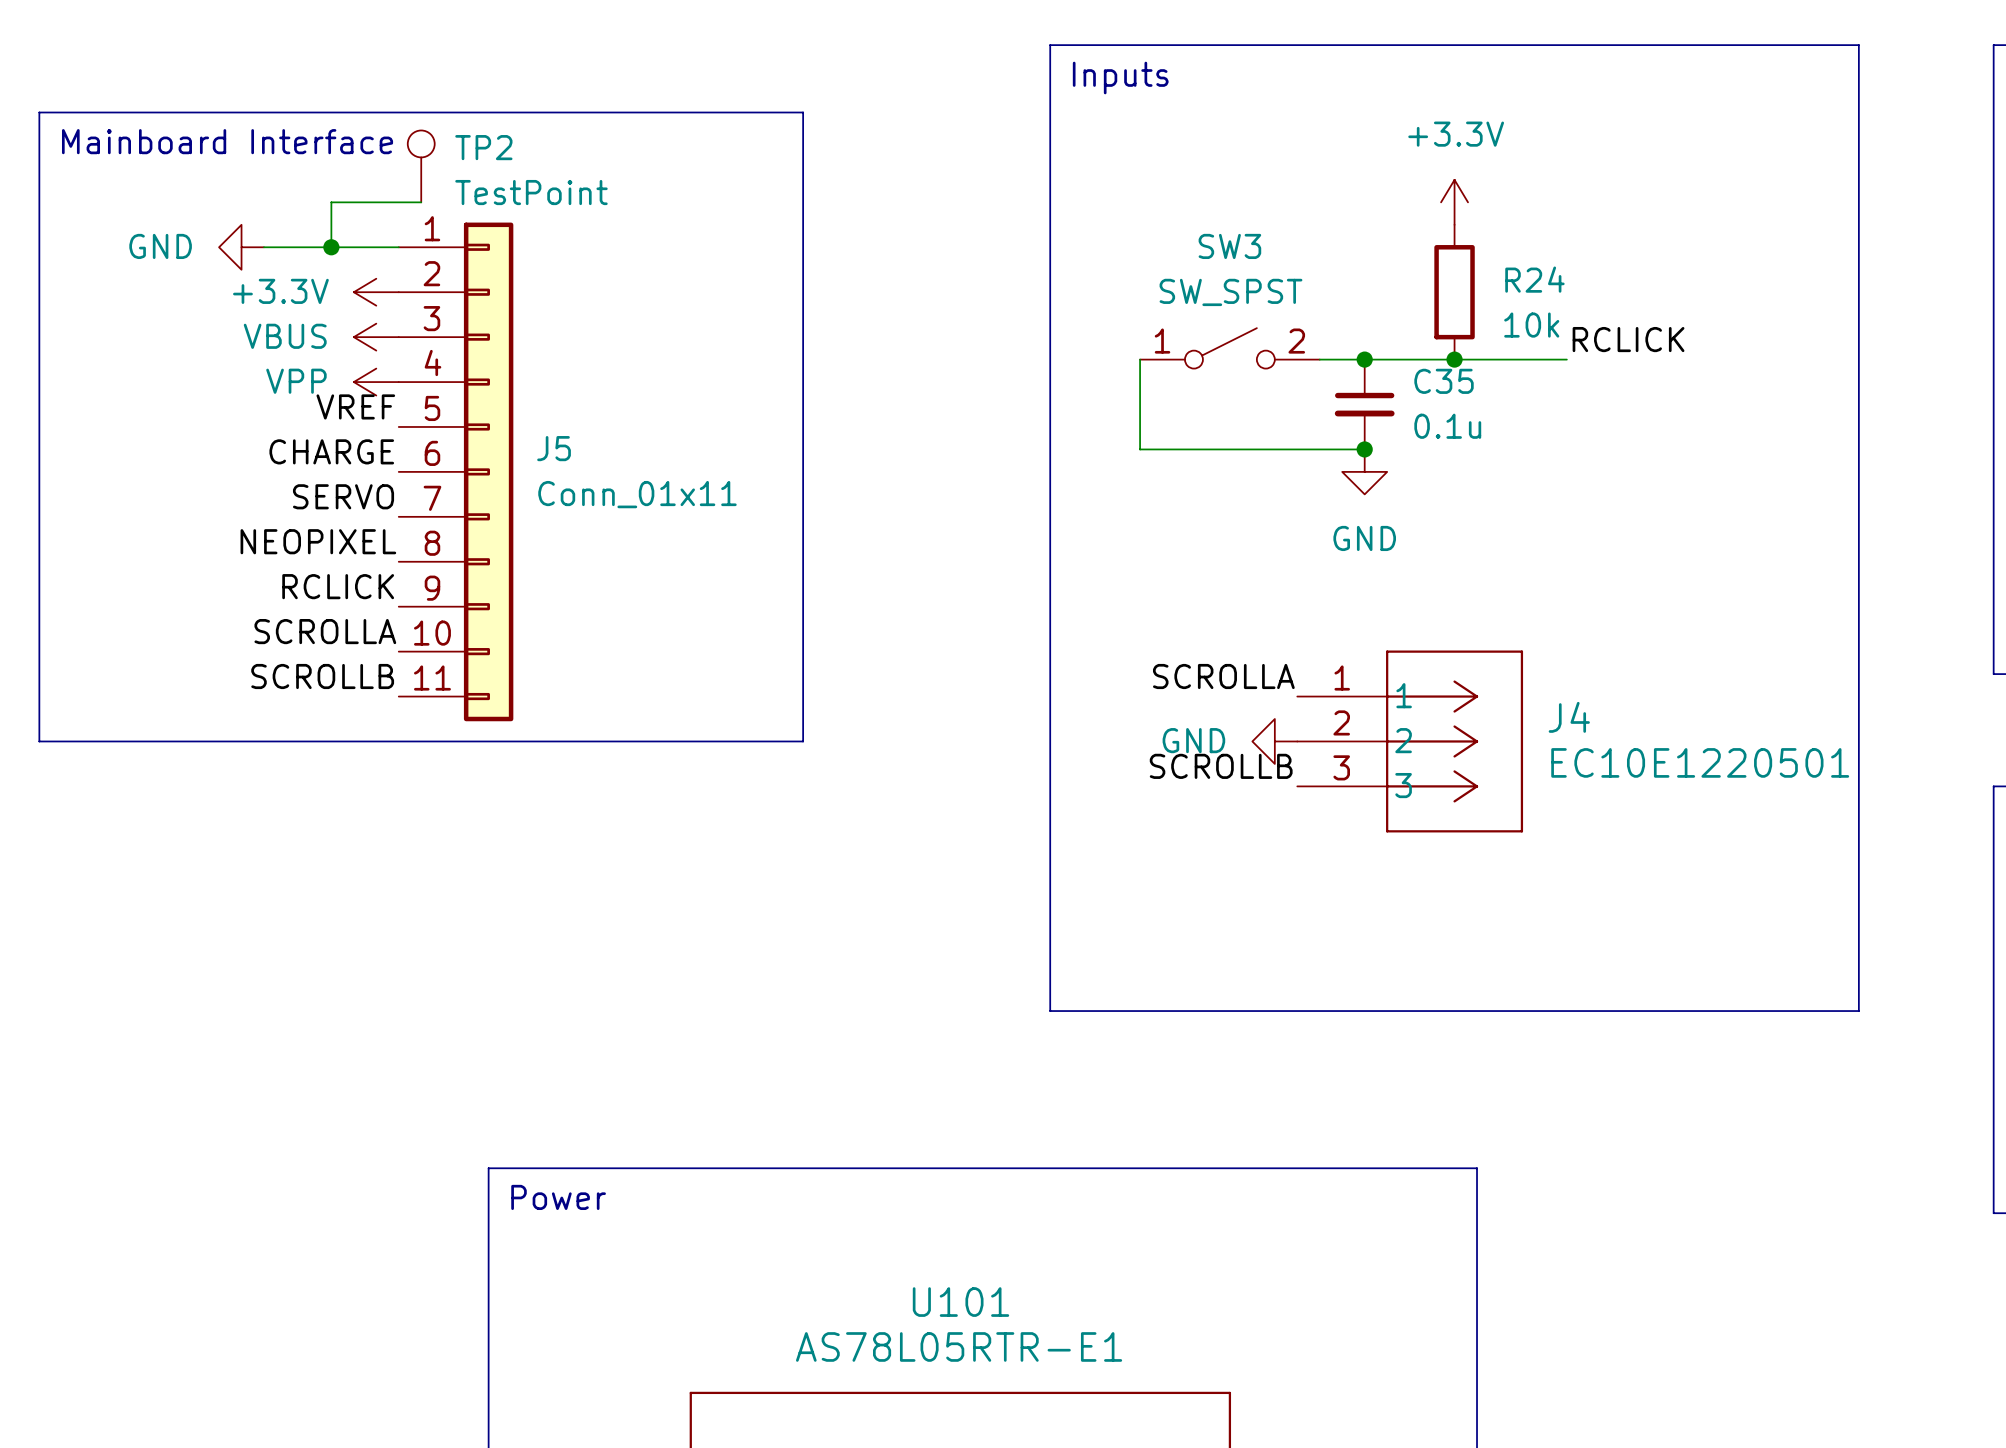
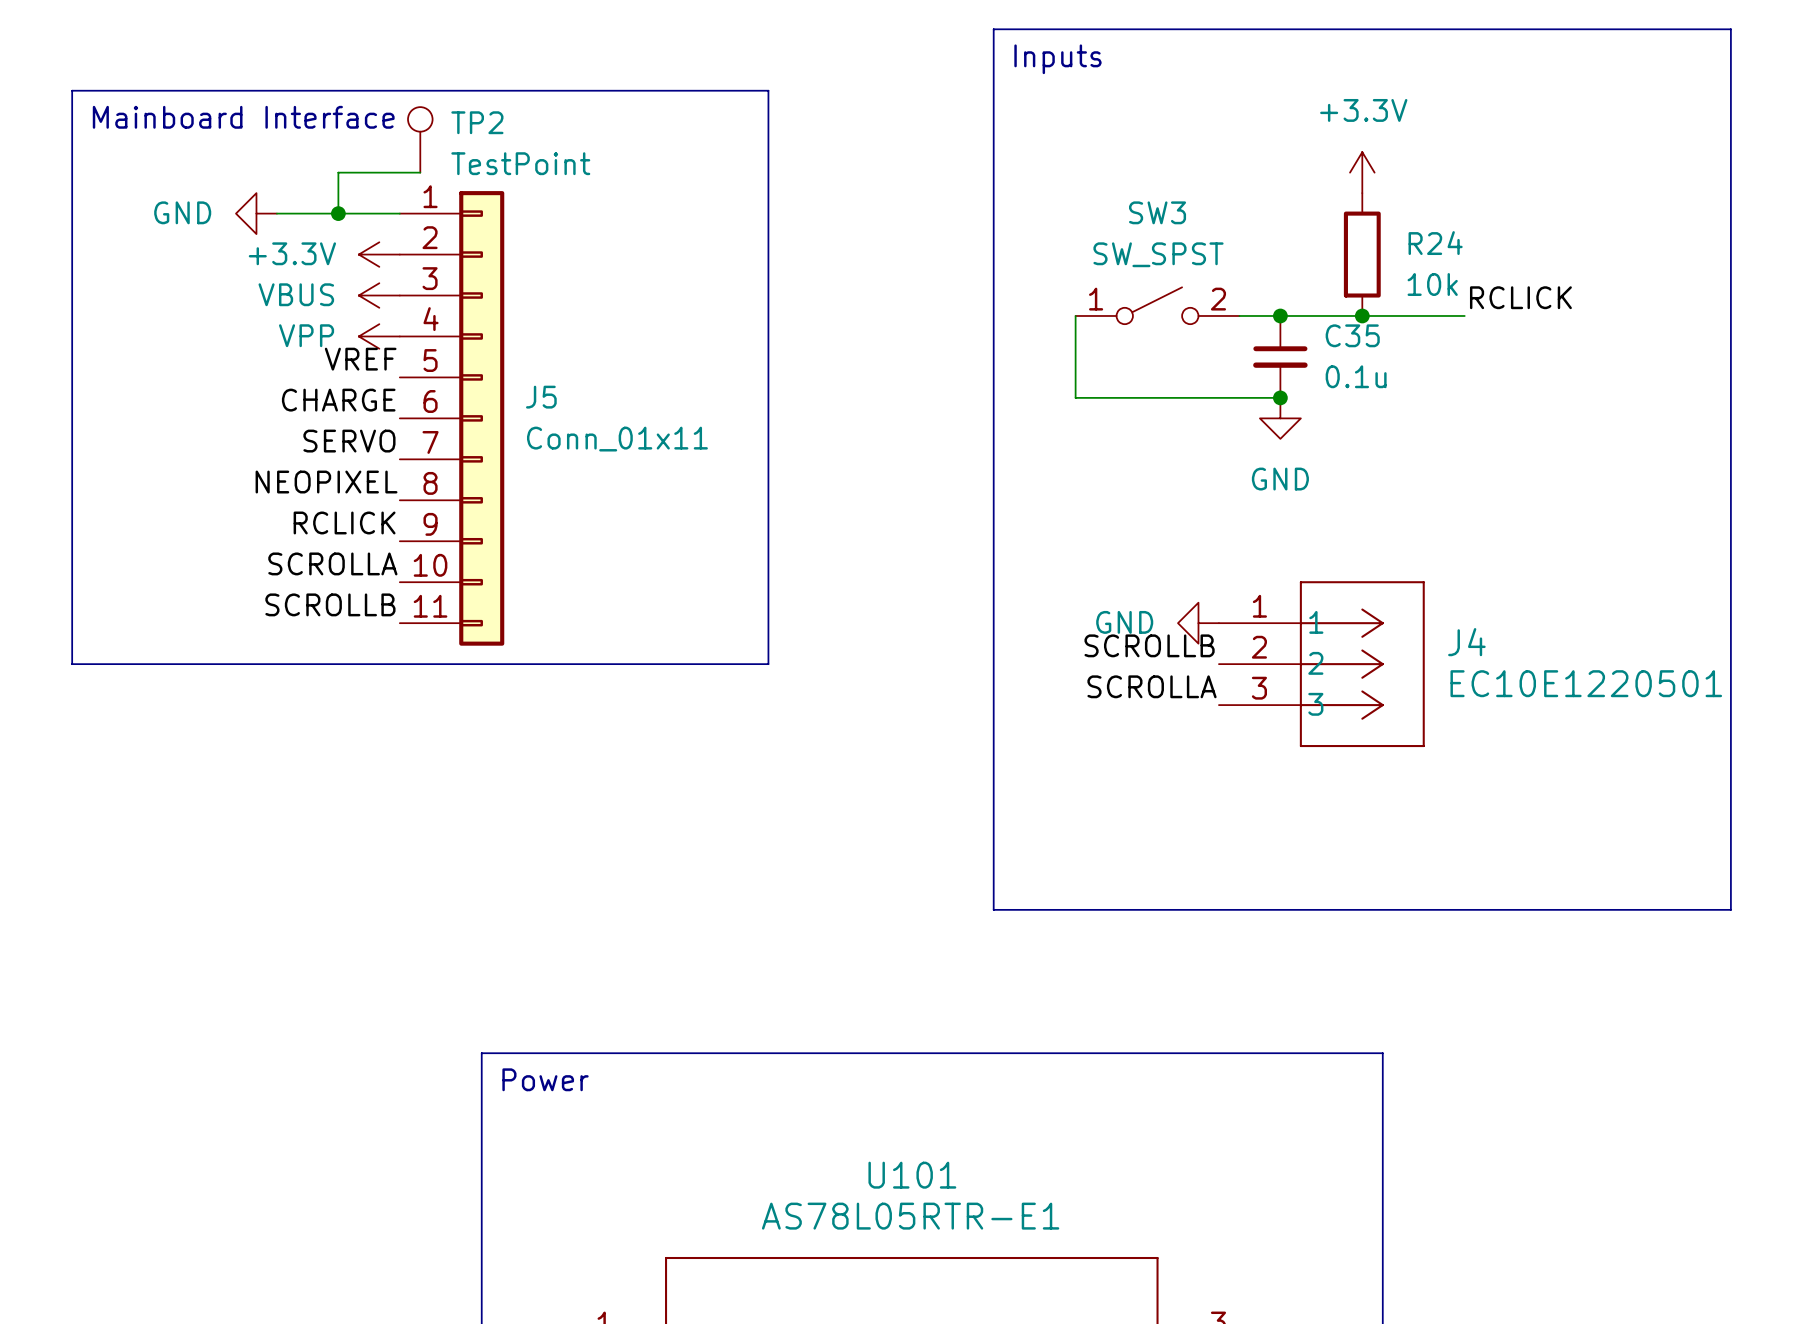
label: SCROLLA (1223, 676) -> SCROLLB (1149, 645)
power symbol position: GND (1274, 741) -> GND (1198, 623)
label: SCROLLB (1221, 766) -> SCROLLA (1152, 686)

